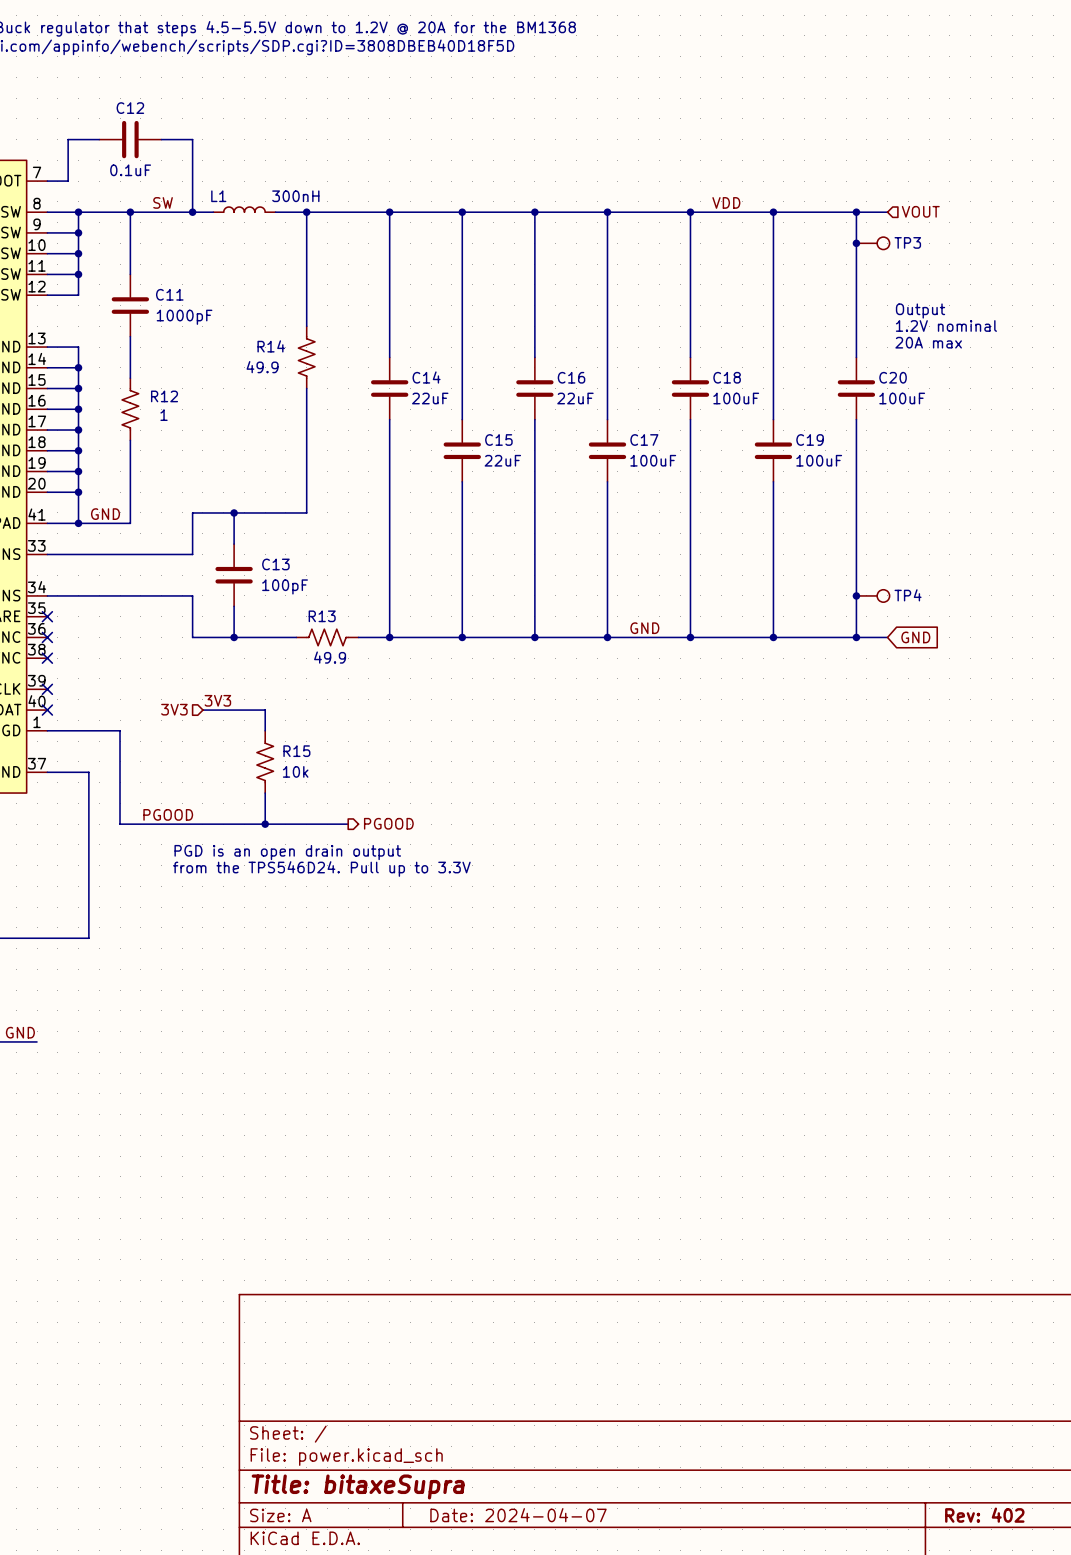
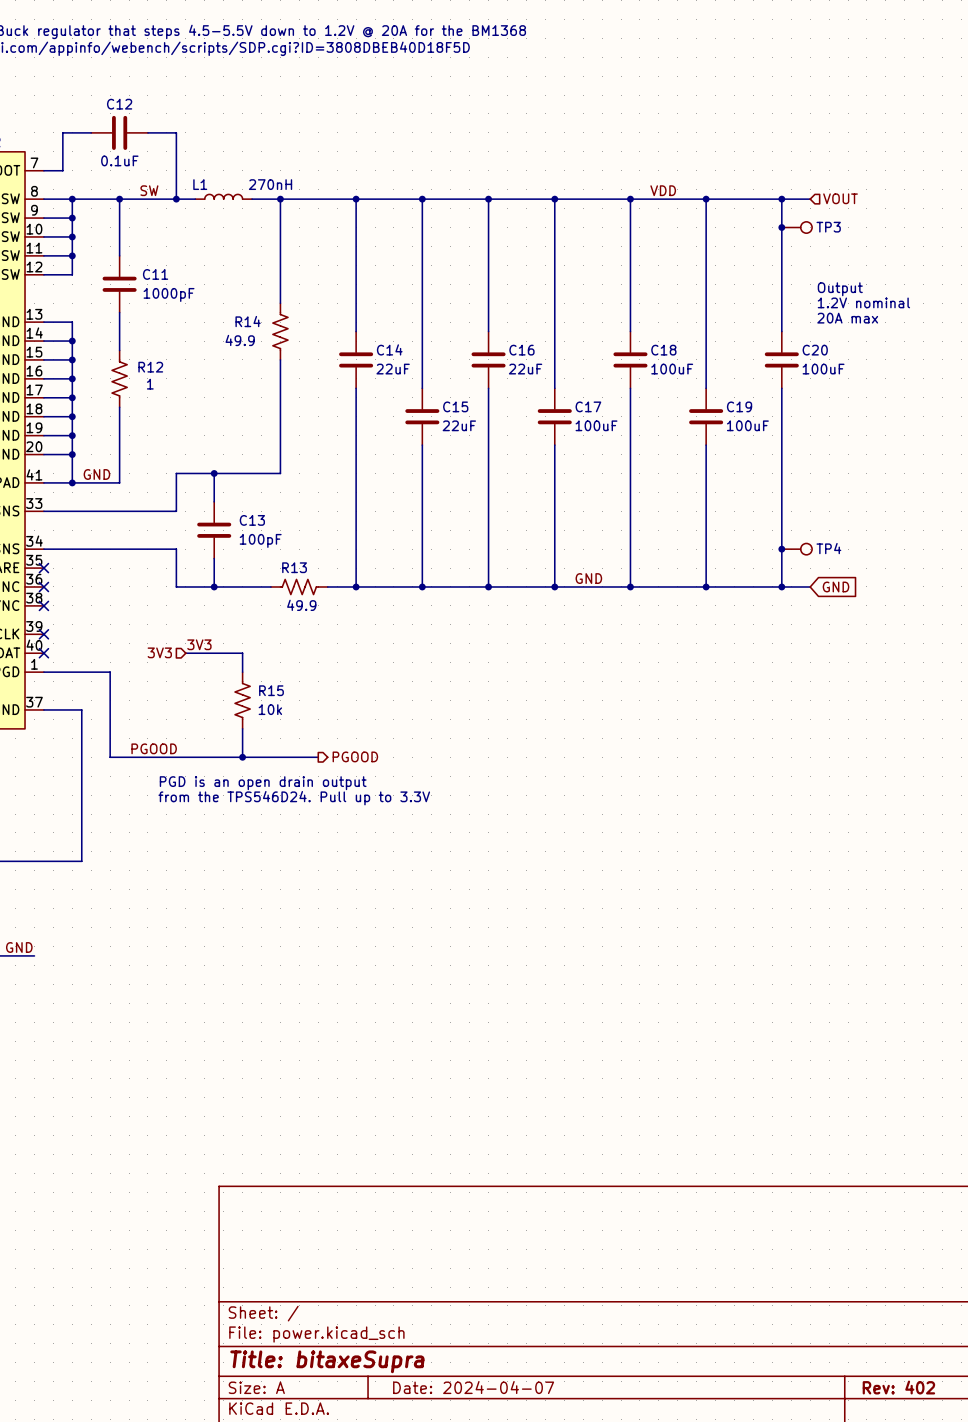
L1 value: 300nH (295, 196) -> 270nH (270, 184)

